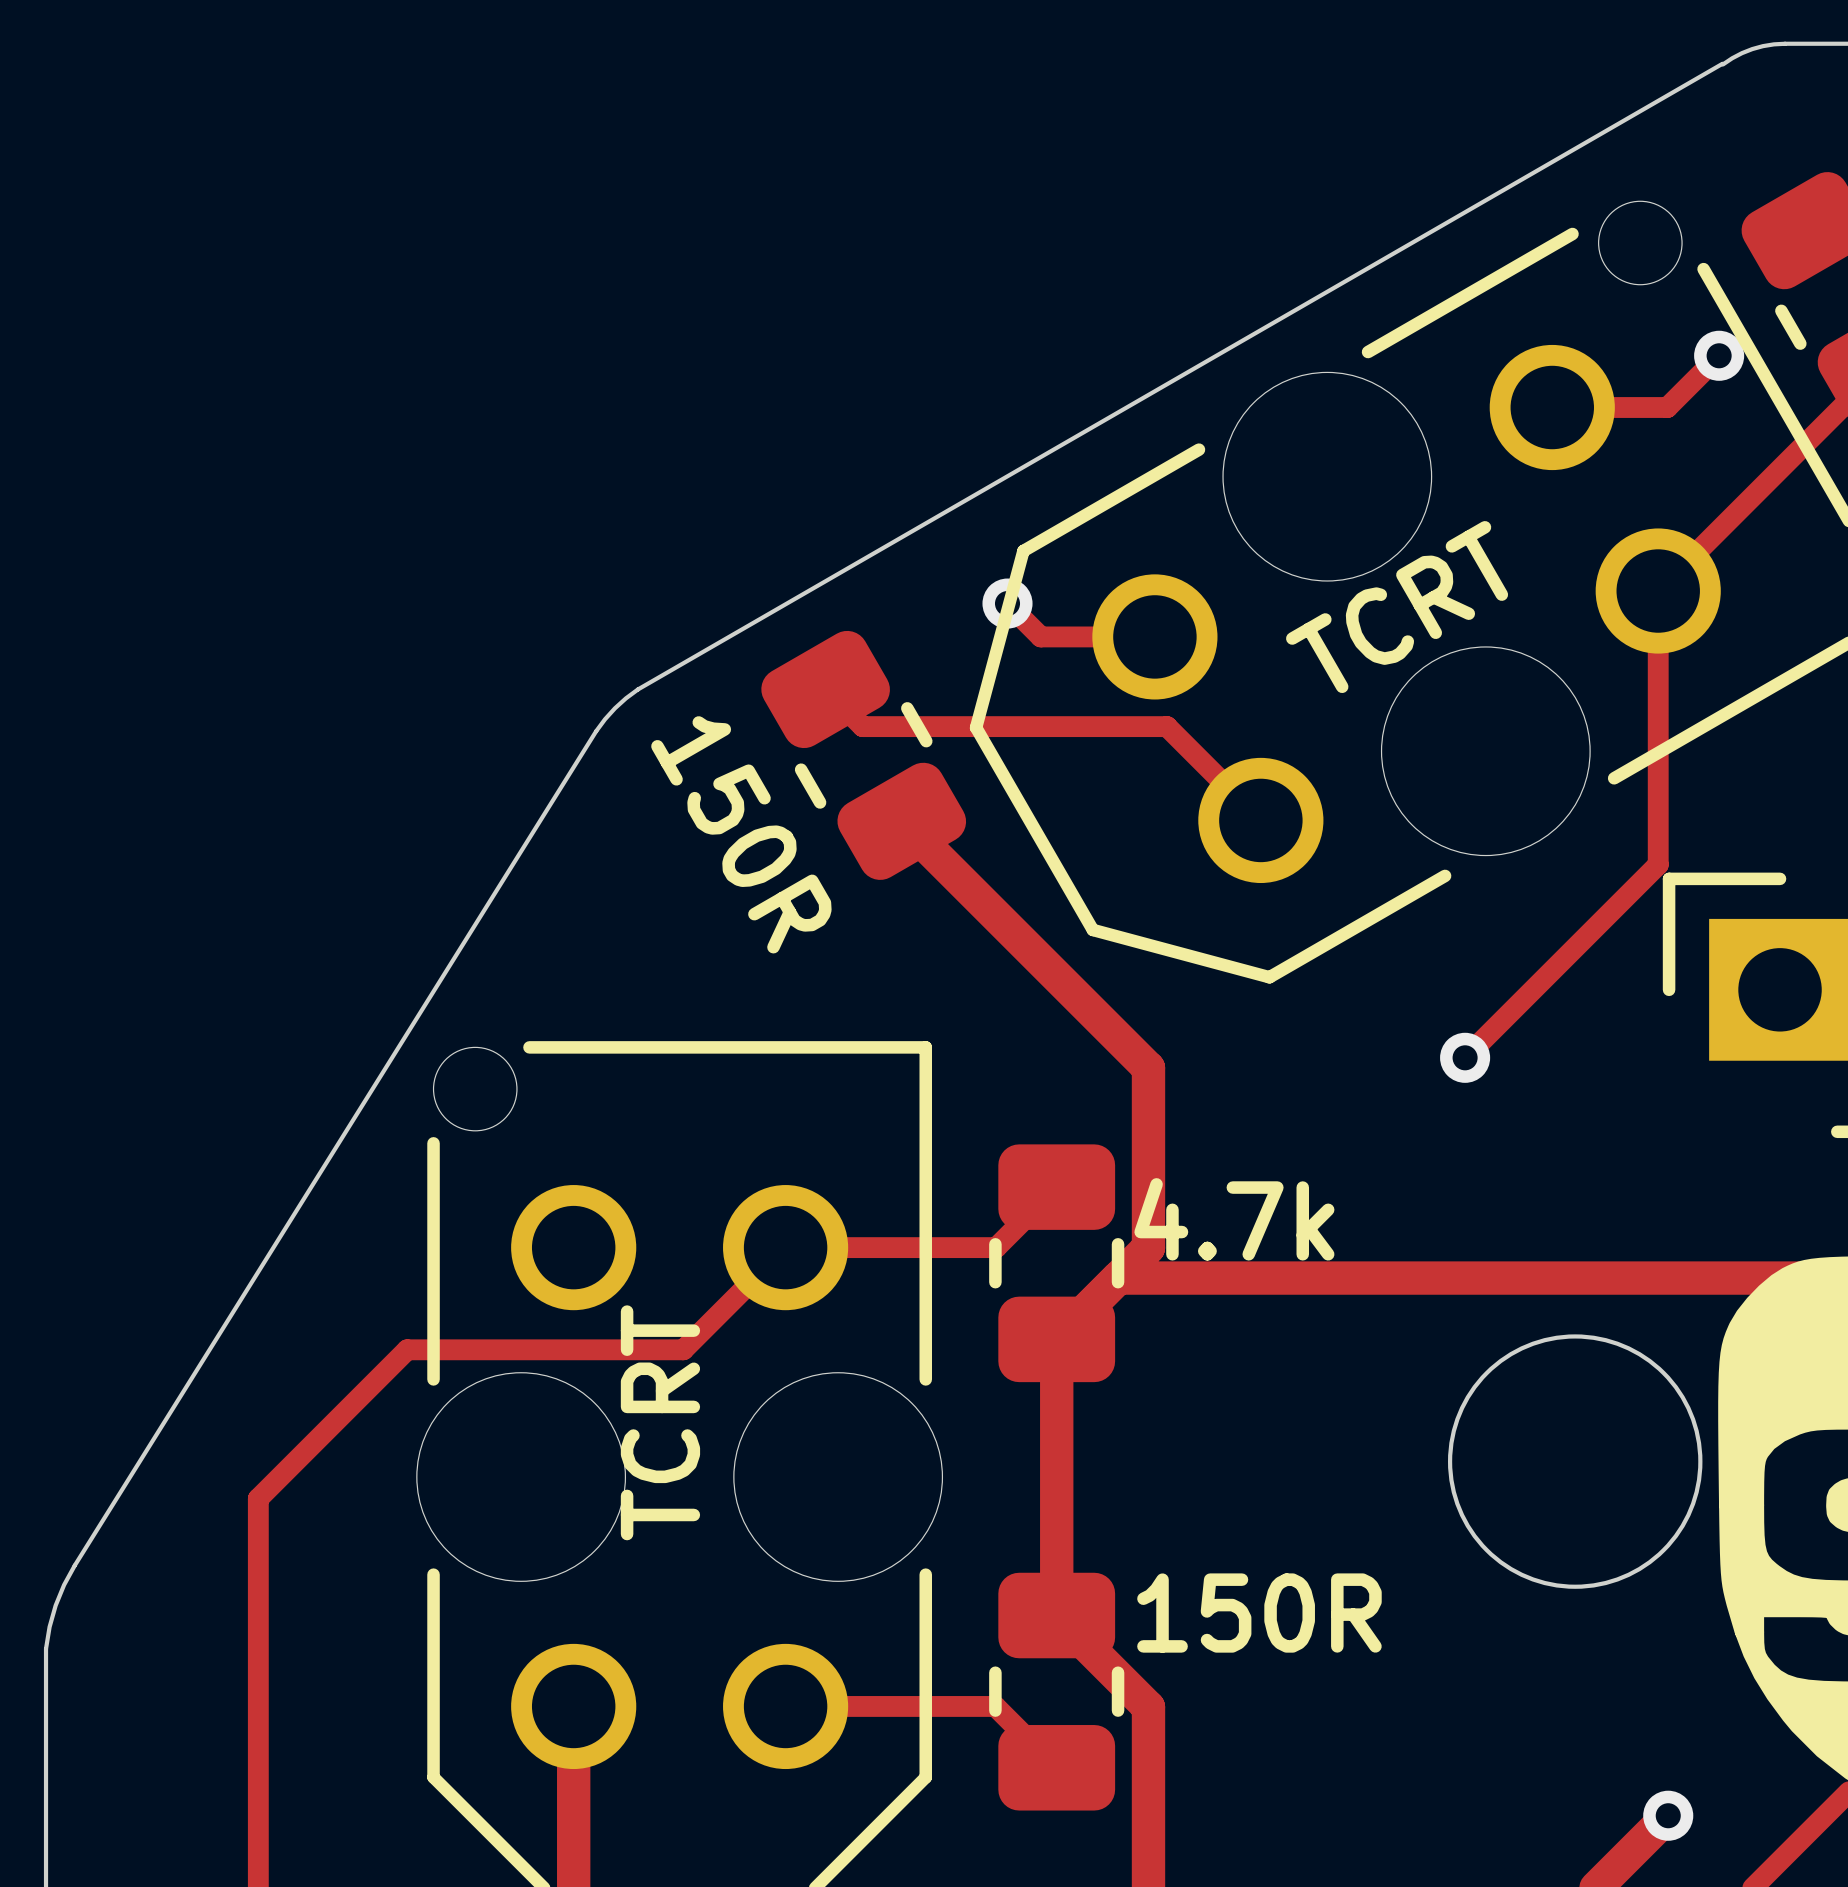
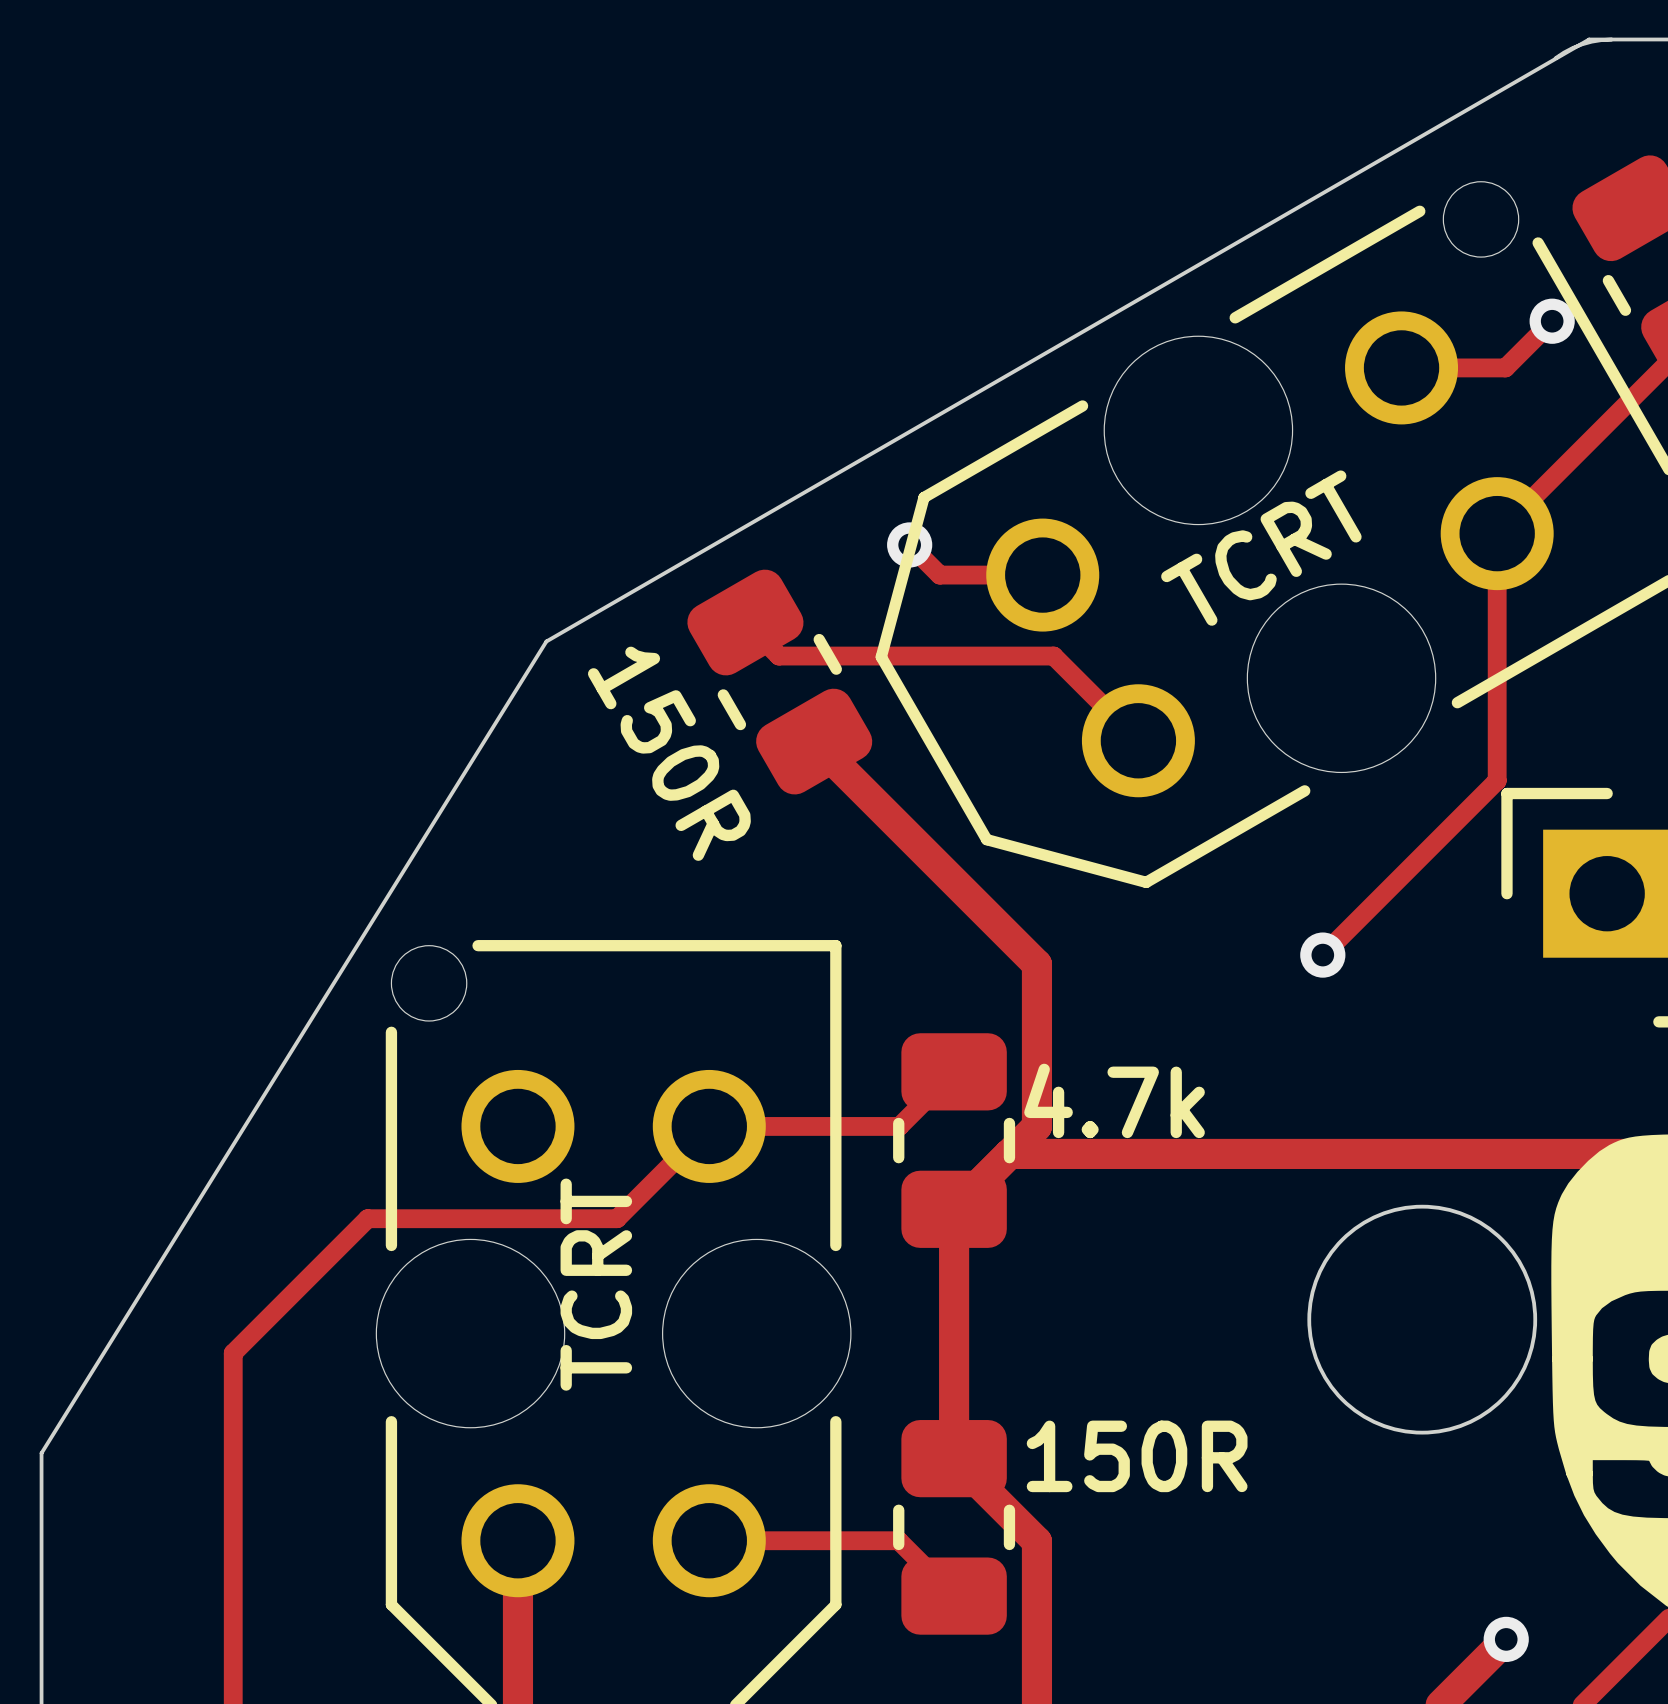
board edge: (1722, 63) (637, 689) (615, 708) (596, 731) (74, 1565) (55, 1605) (46, 1648) -> (1611, 39) (1589, 39) (546, 641) (41, 1453) (41, 1488)

